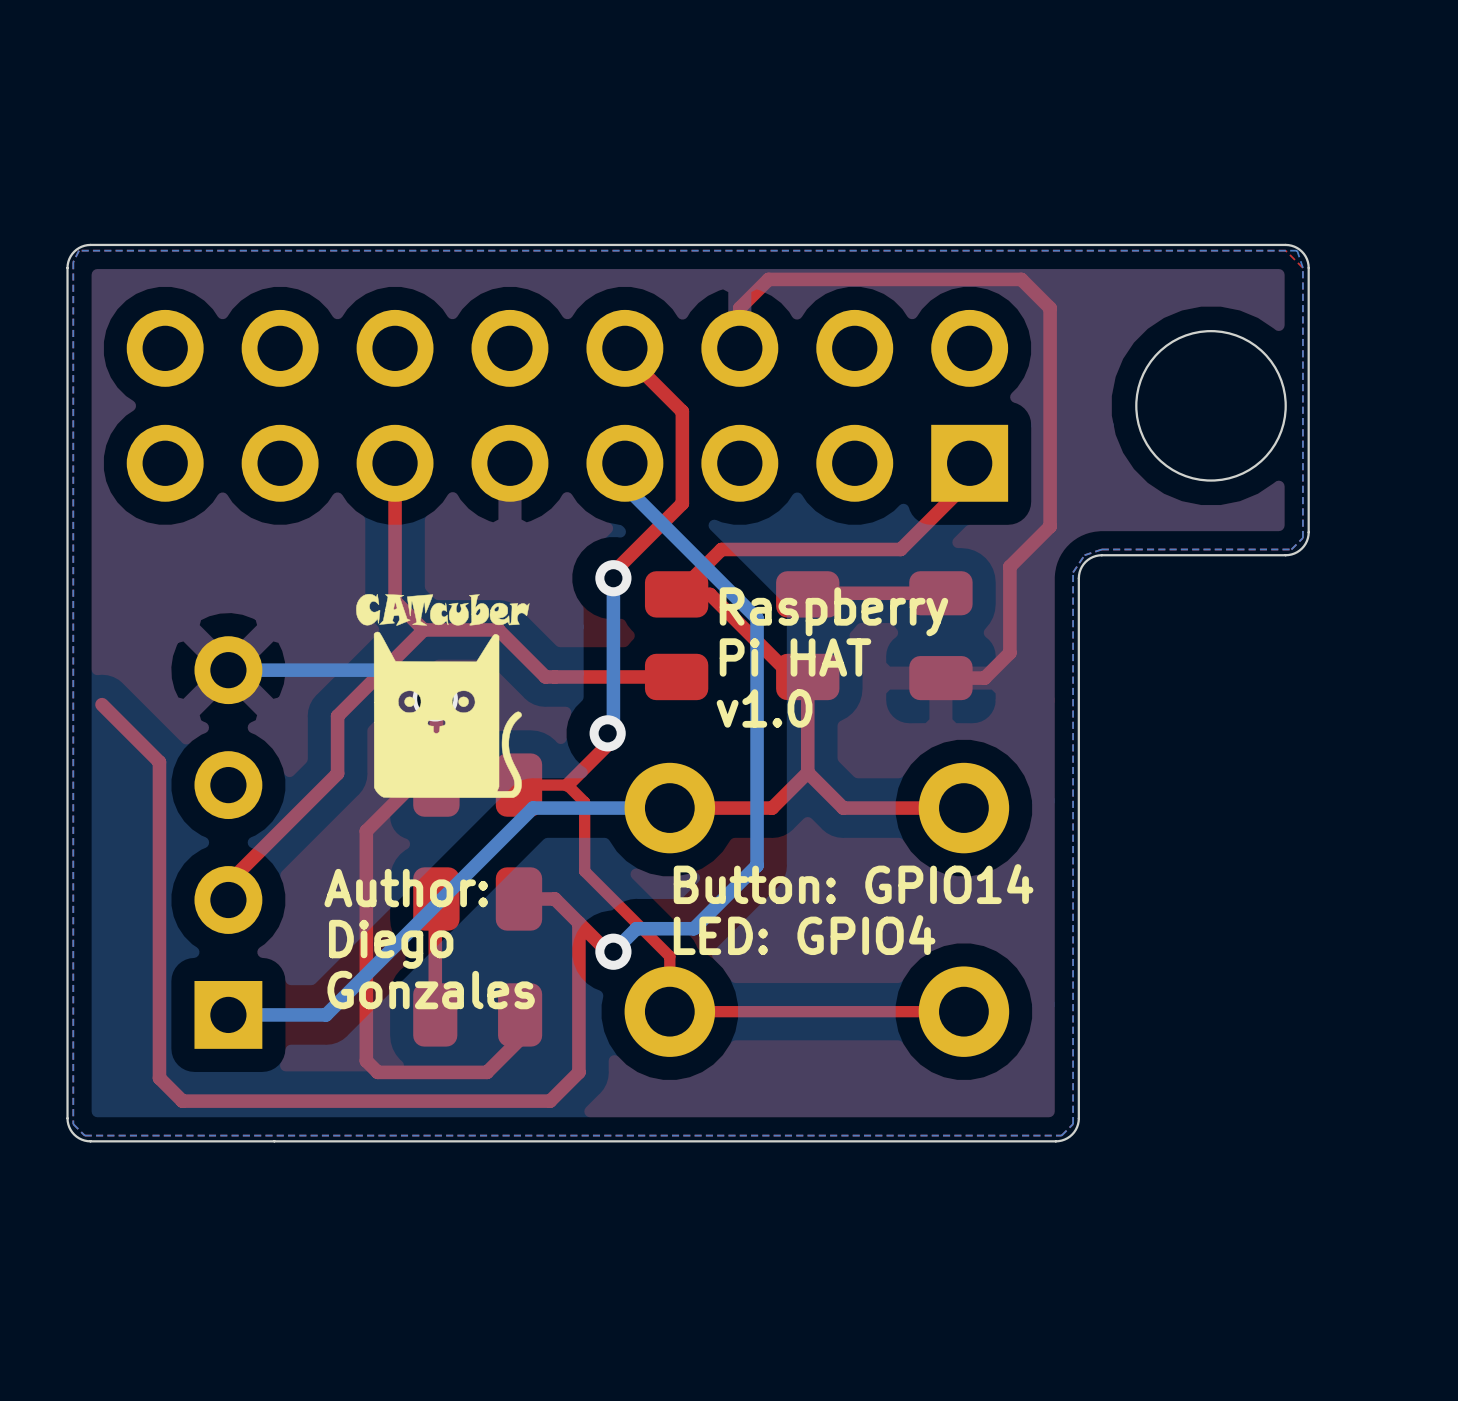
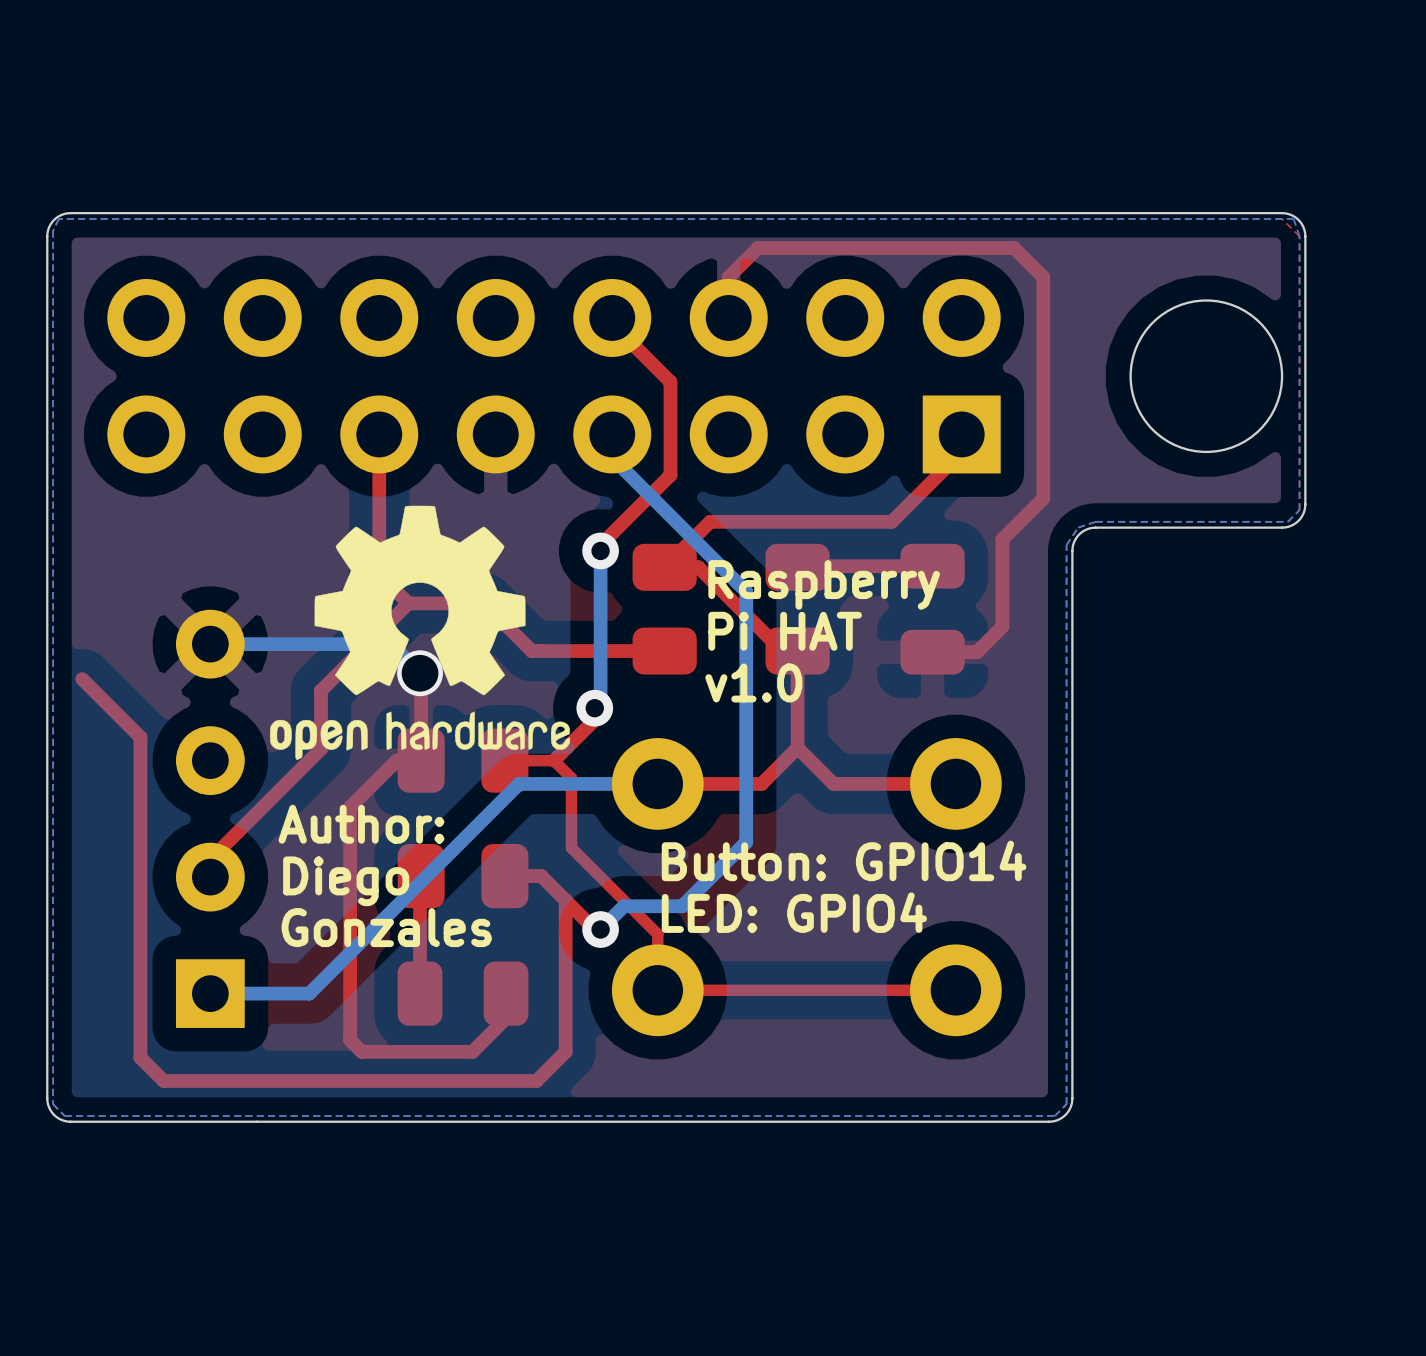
drawing shape: [356, 593, 530, 798] -> [270, 505, 571, 760]
text position: Author: (406, 888) -> Author: (361, 824)
text position: Diego (391, 944) -> Diego (346, 881)
text position: Gonzales (431, 990) -> Gonzales (386, 927)

